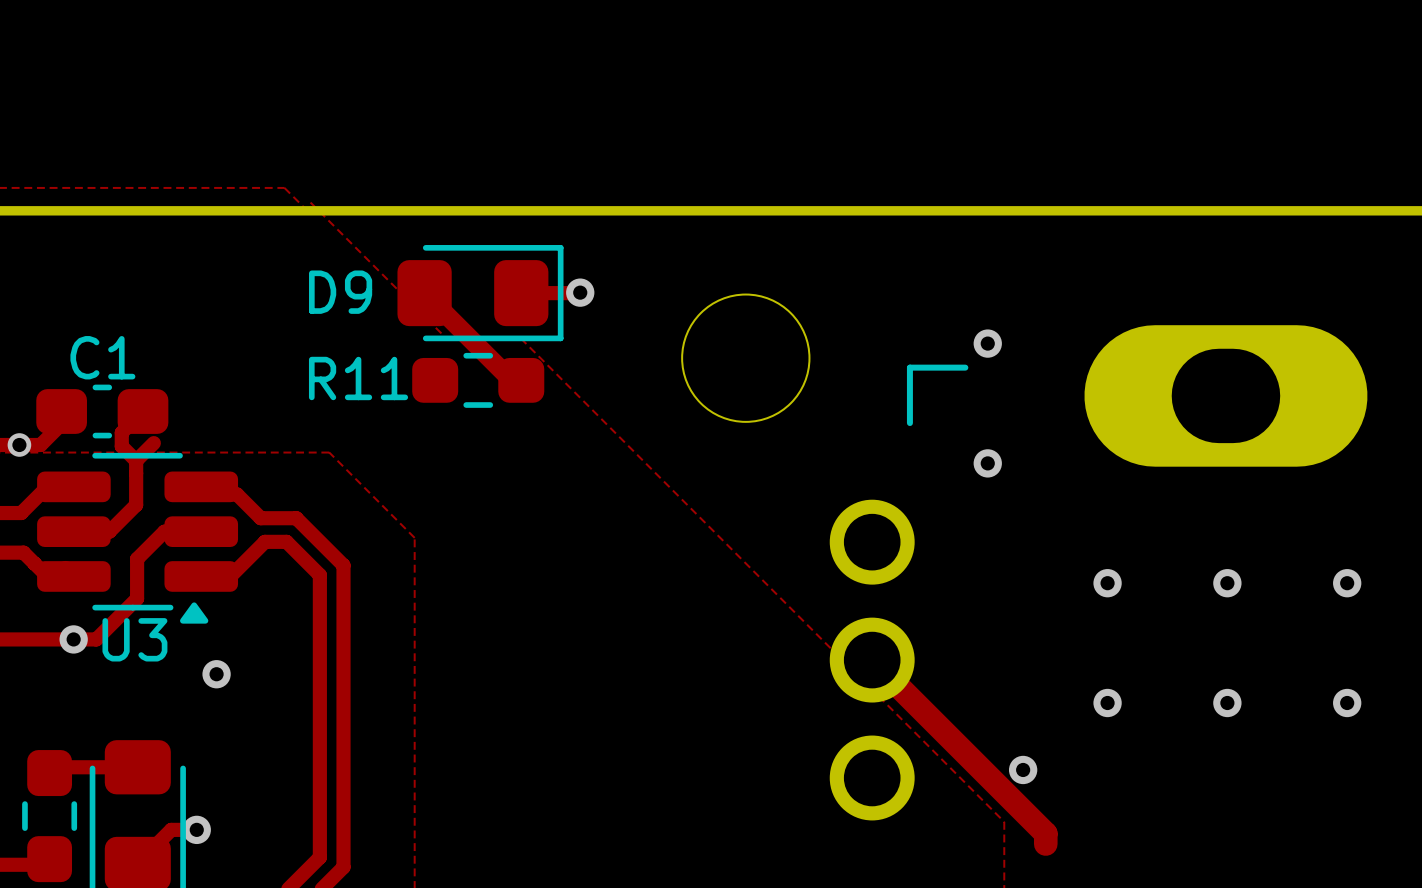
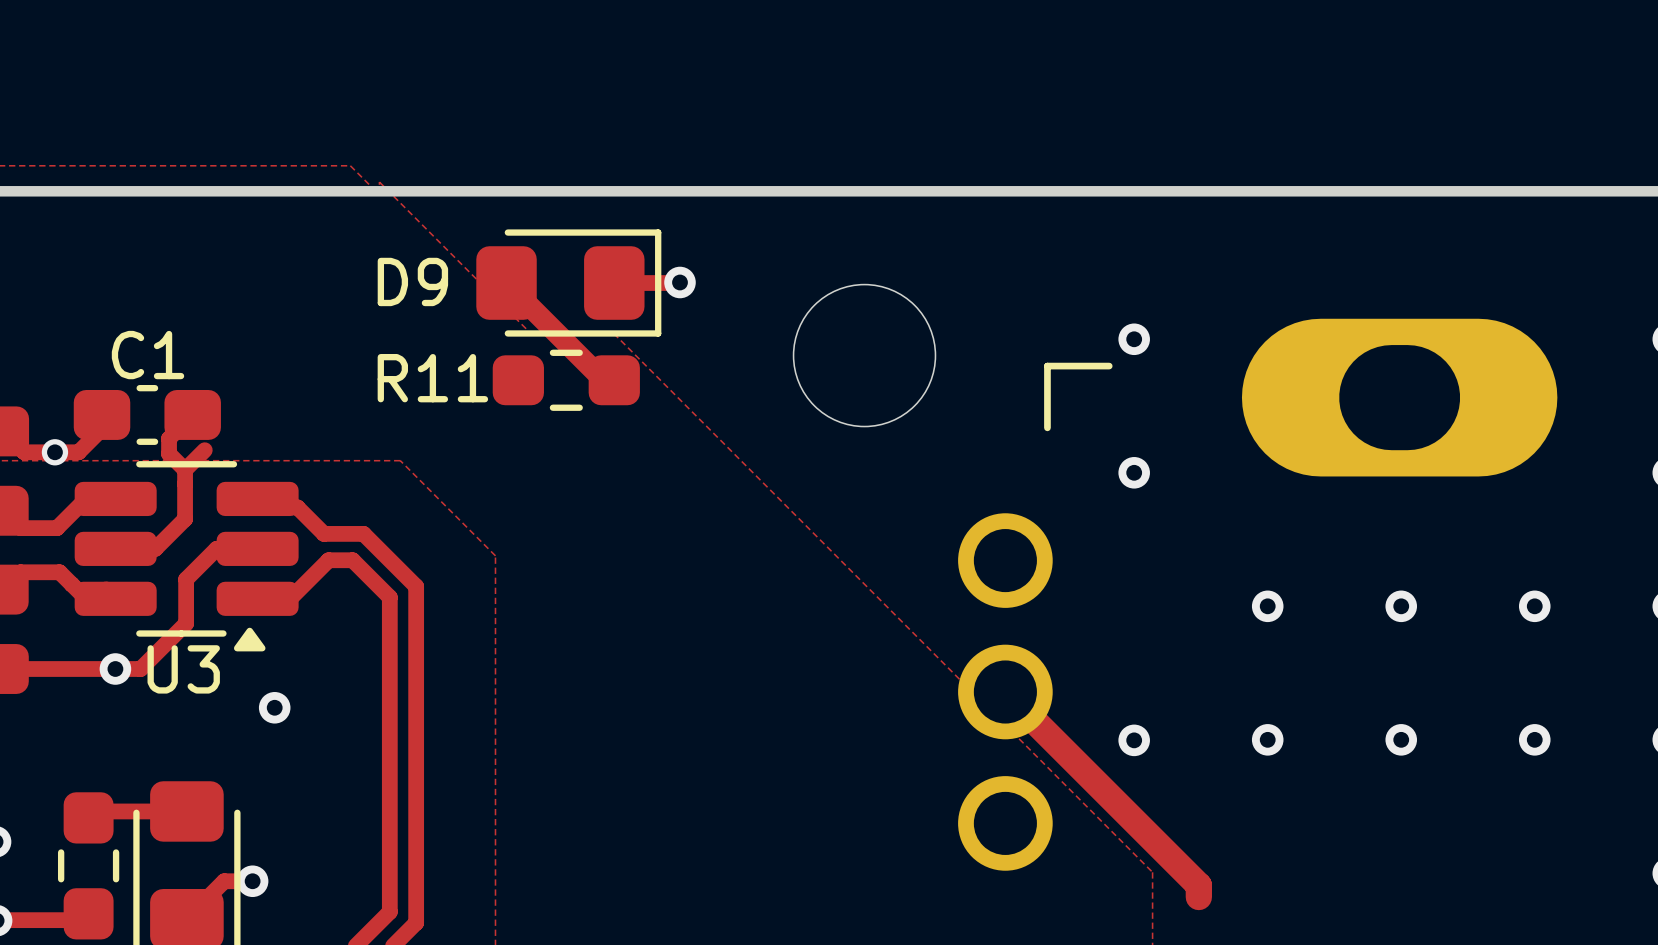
via position: (1023, 769) -> (1134, 740)

